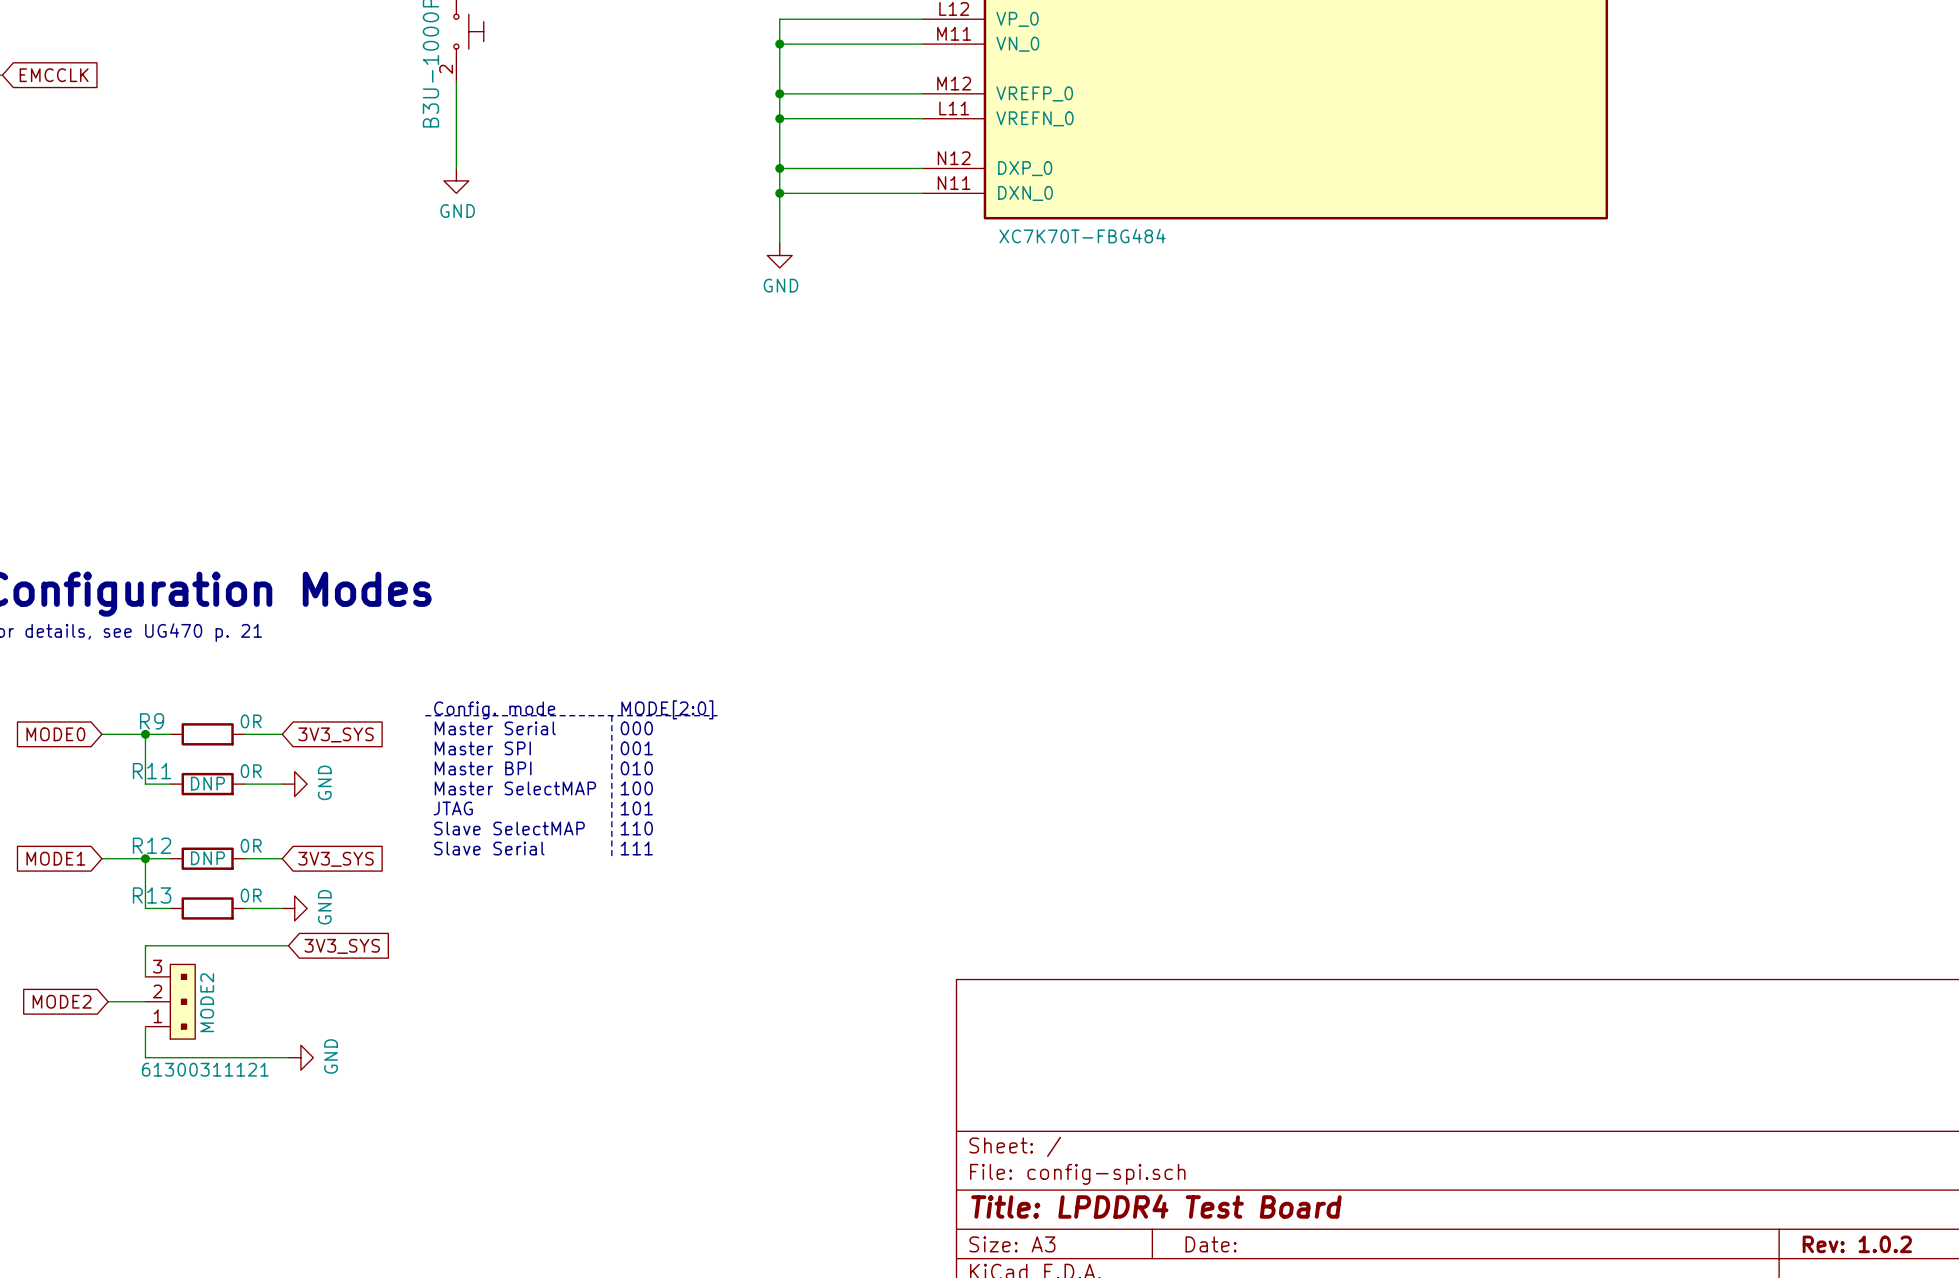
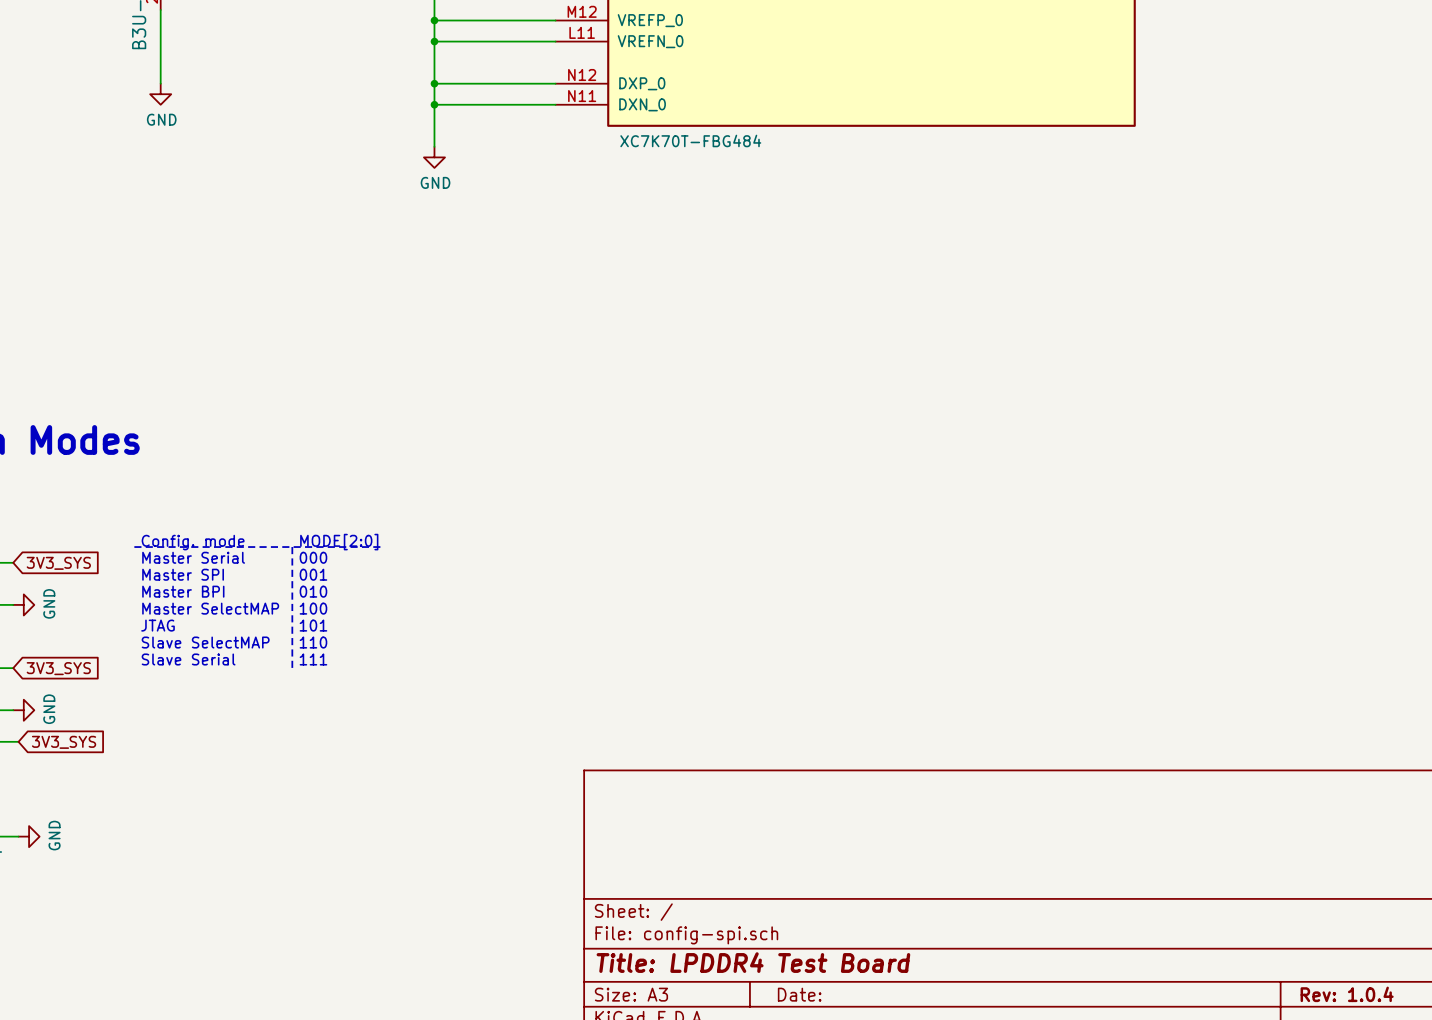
title block: Rev: 1.0.2 (1857, 1244) -> Rev: 1.0.4 (1347, 994)

